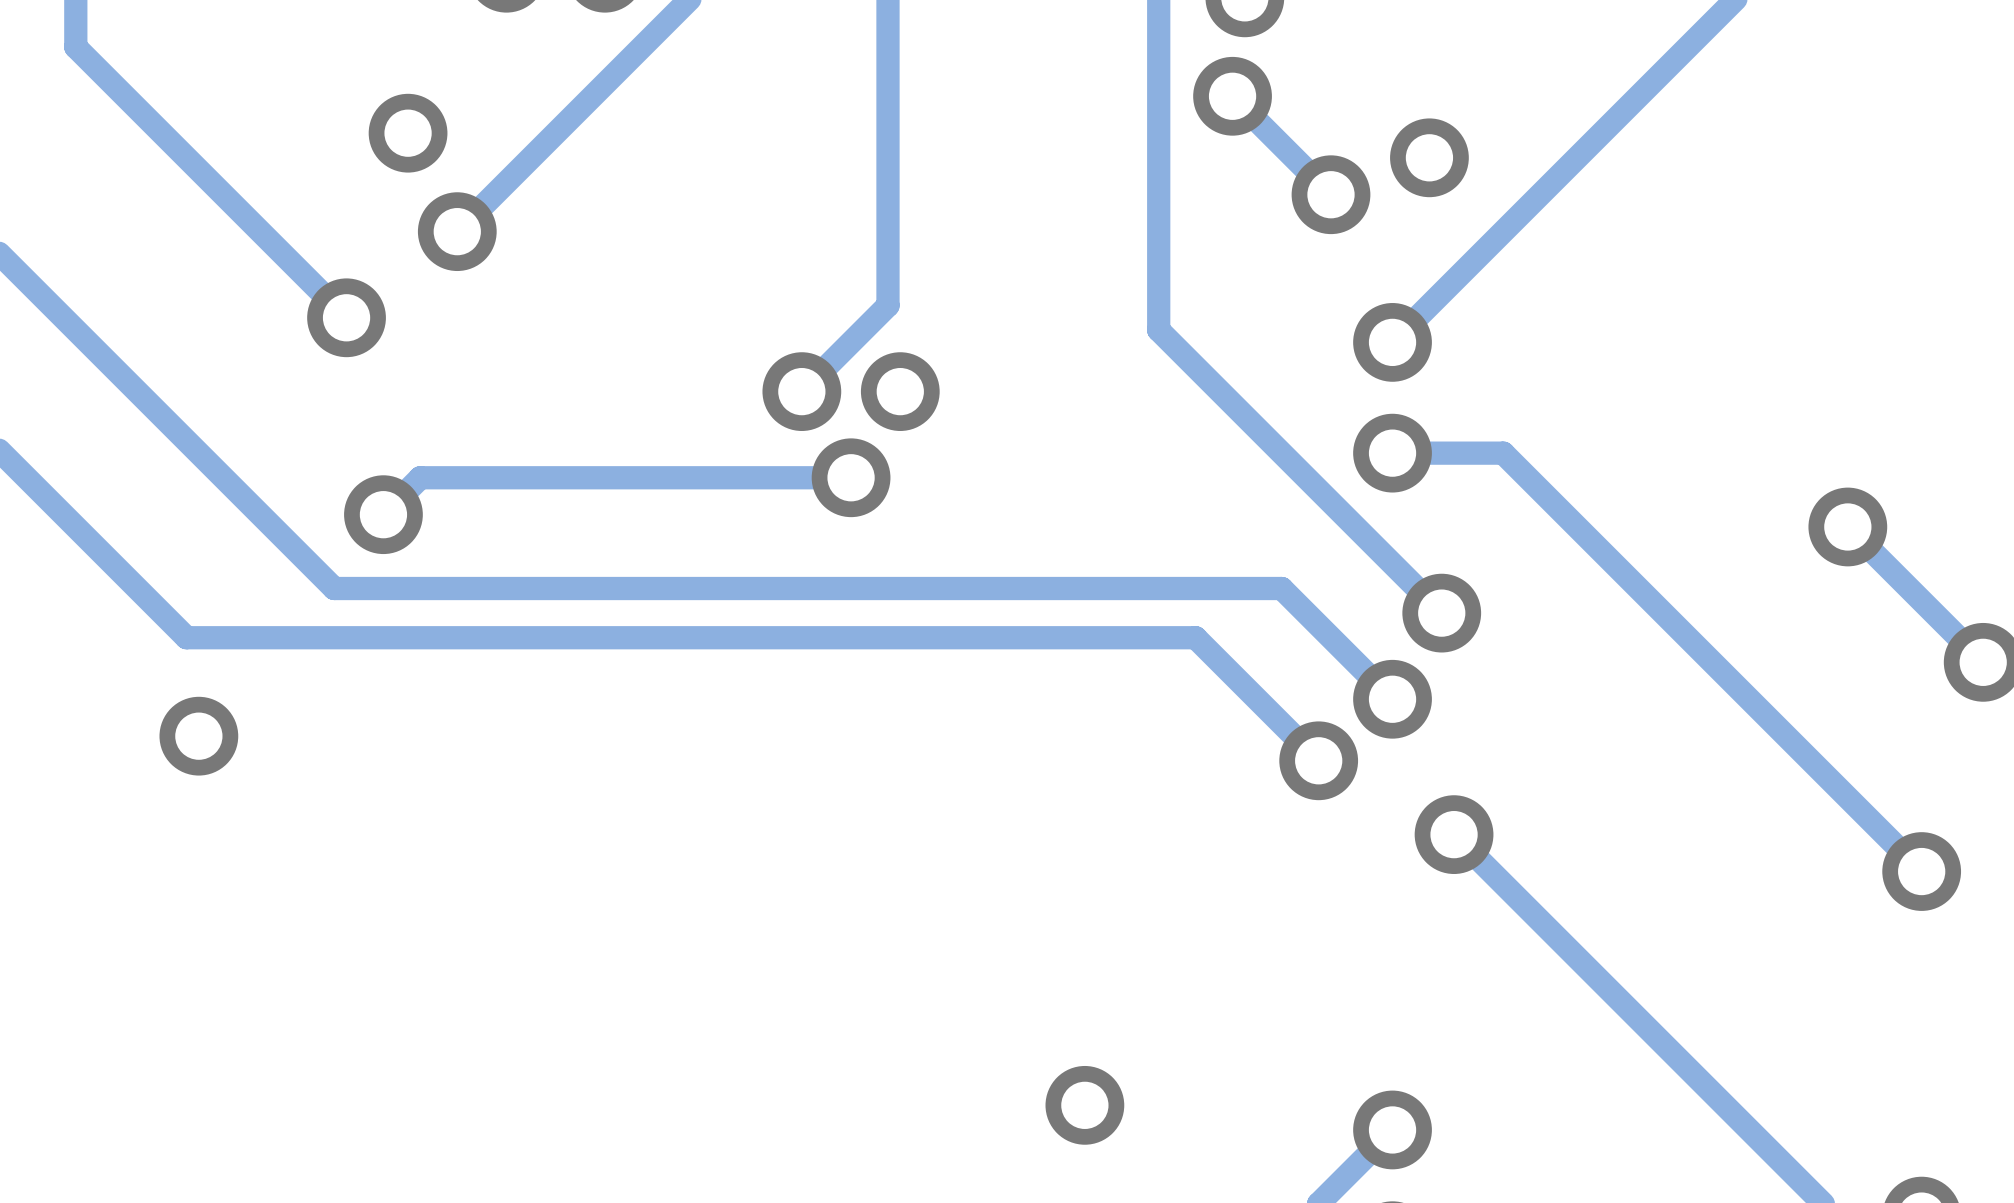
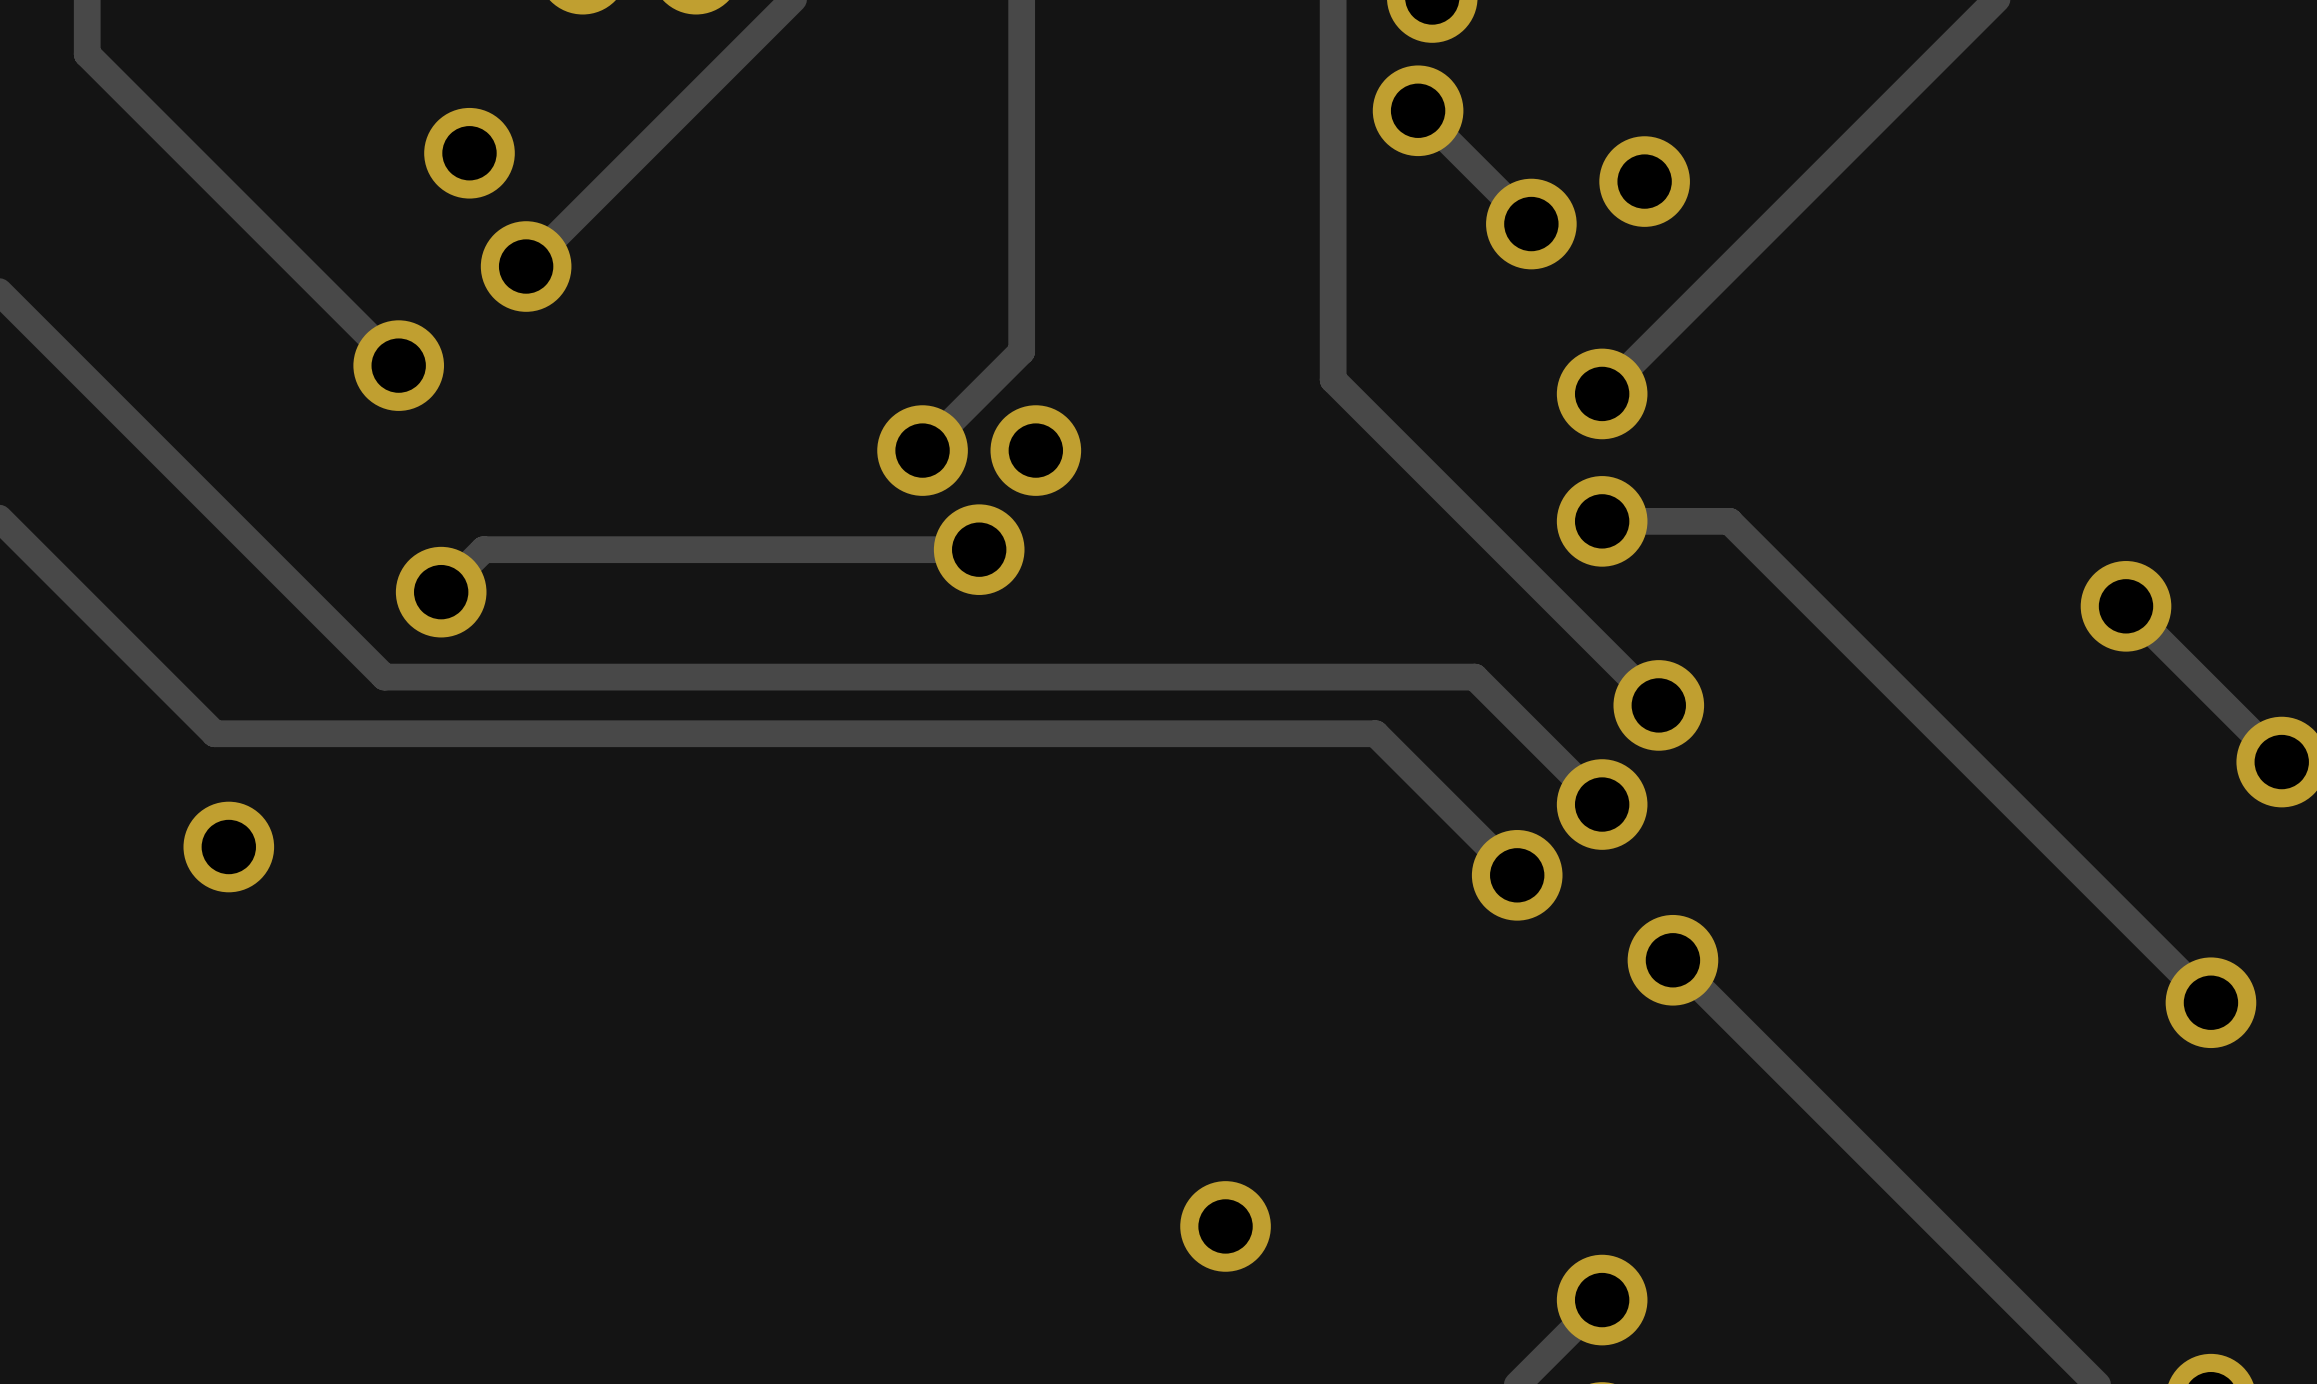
via position: (1084, 1105) -> (1225, 1226)

